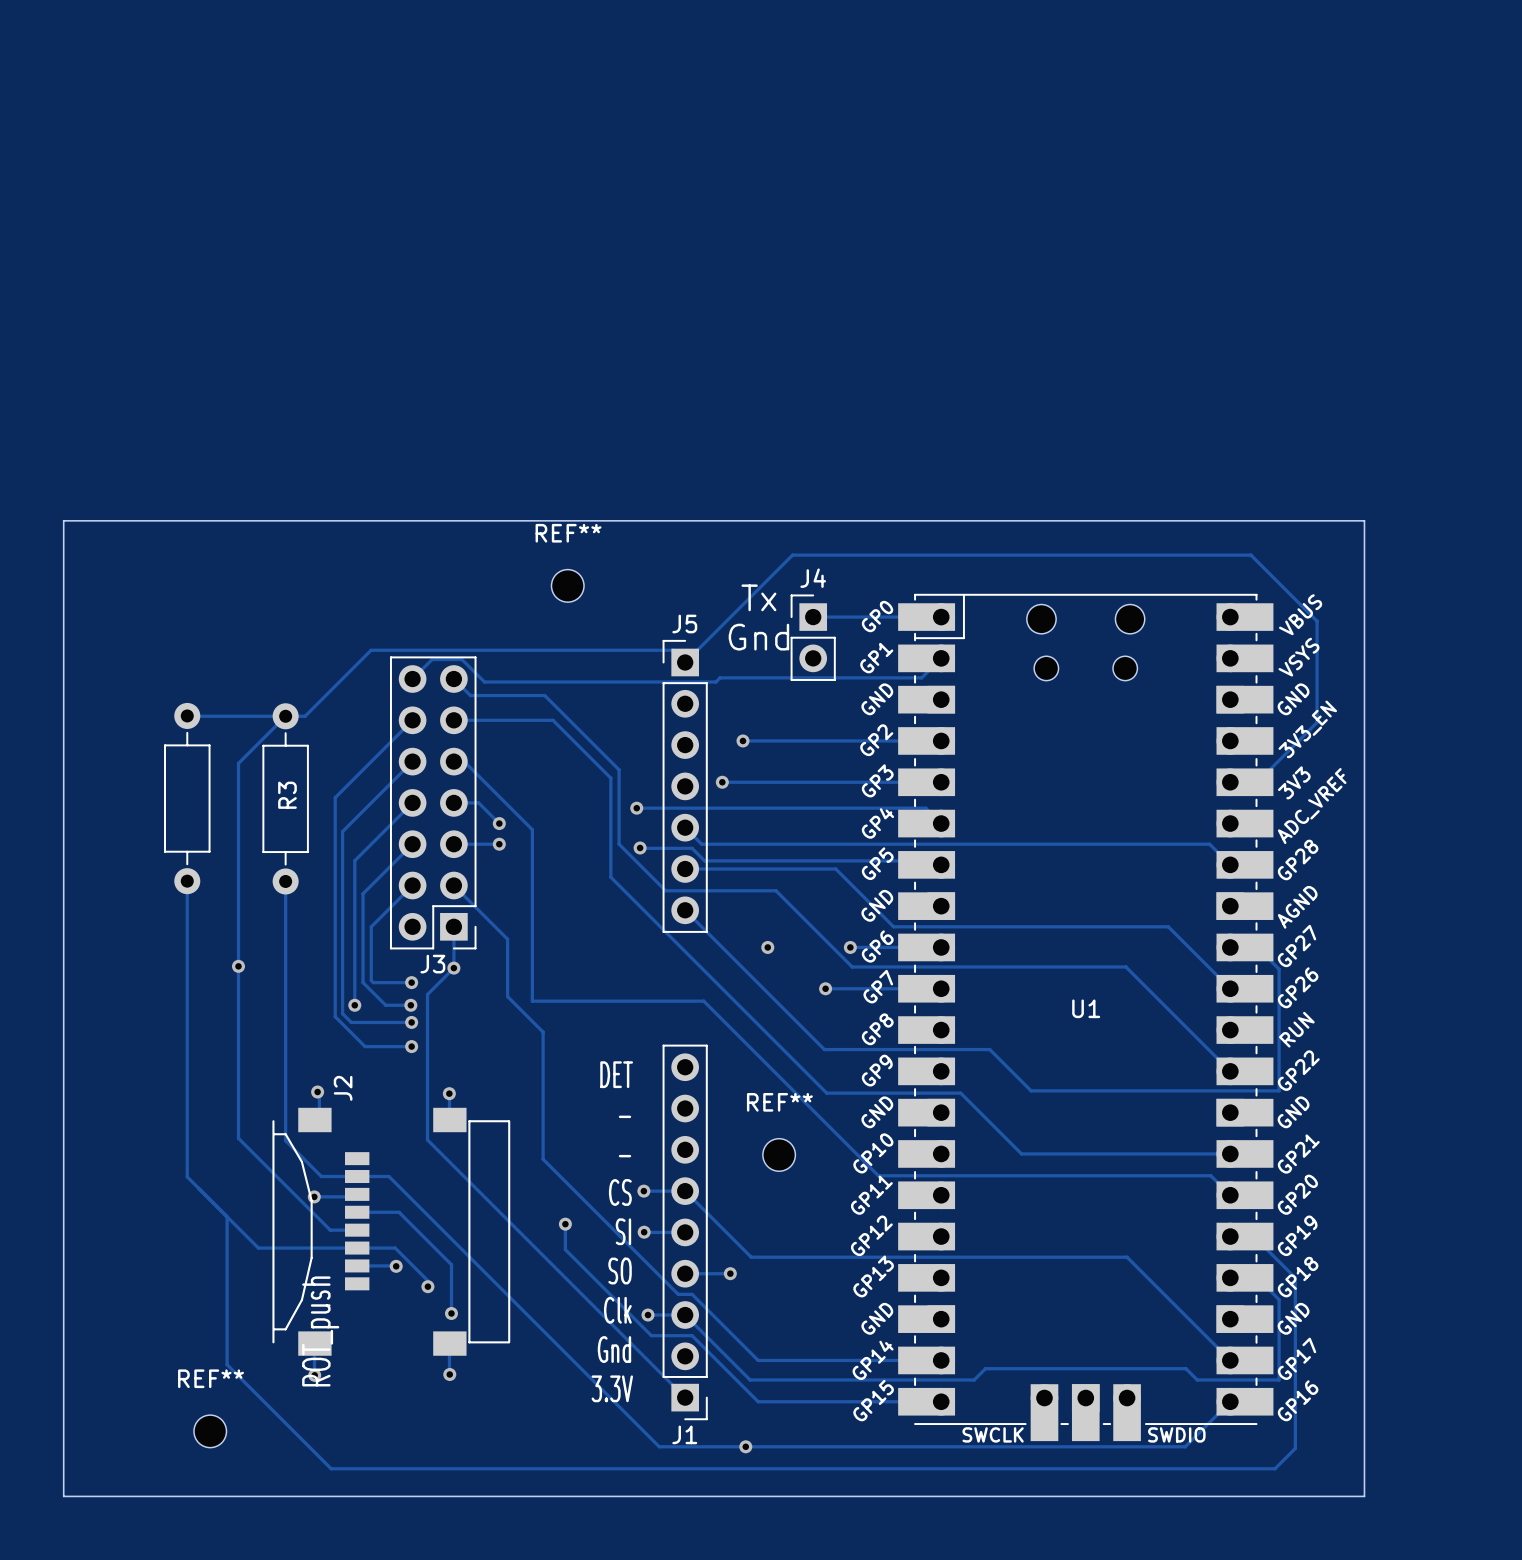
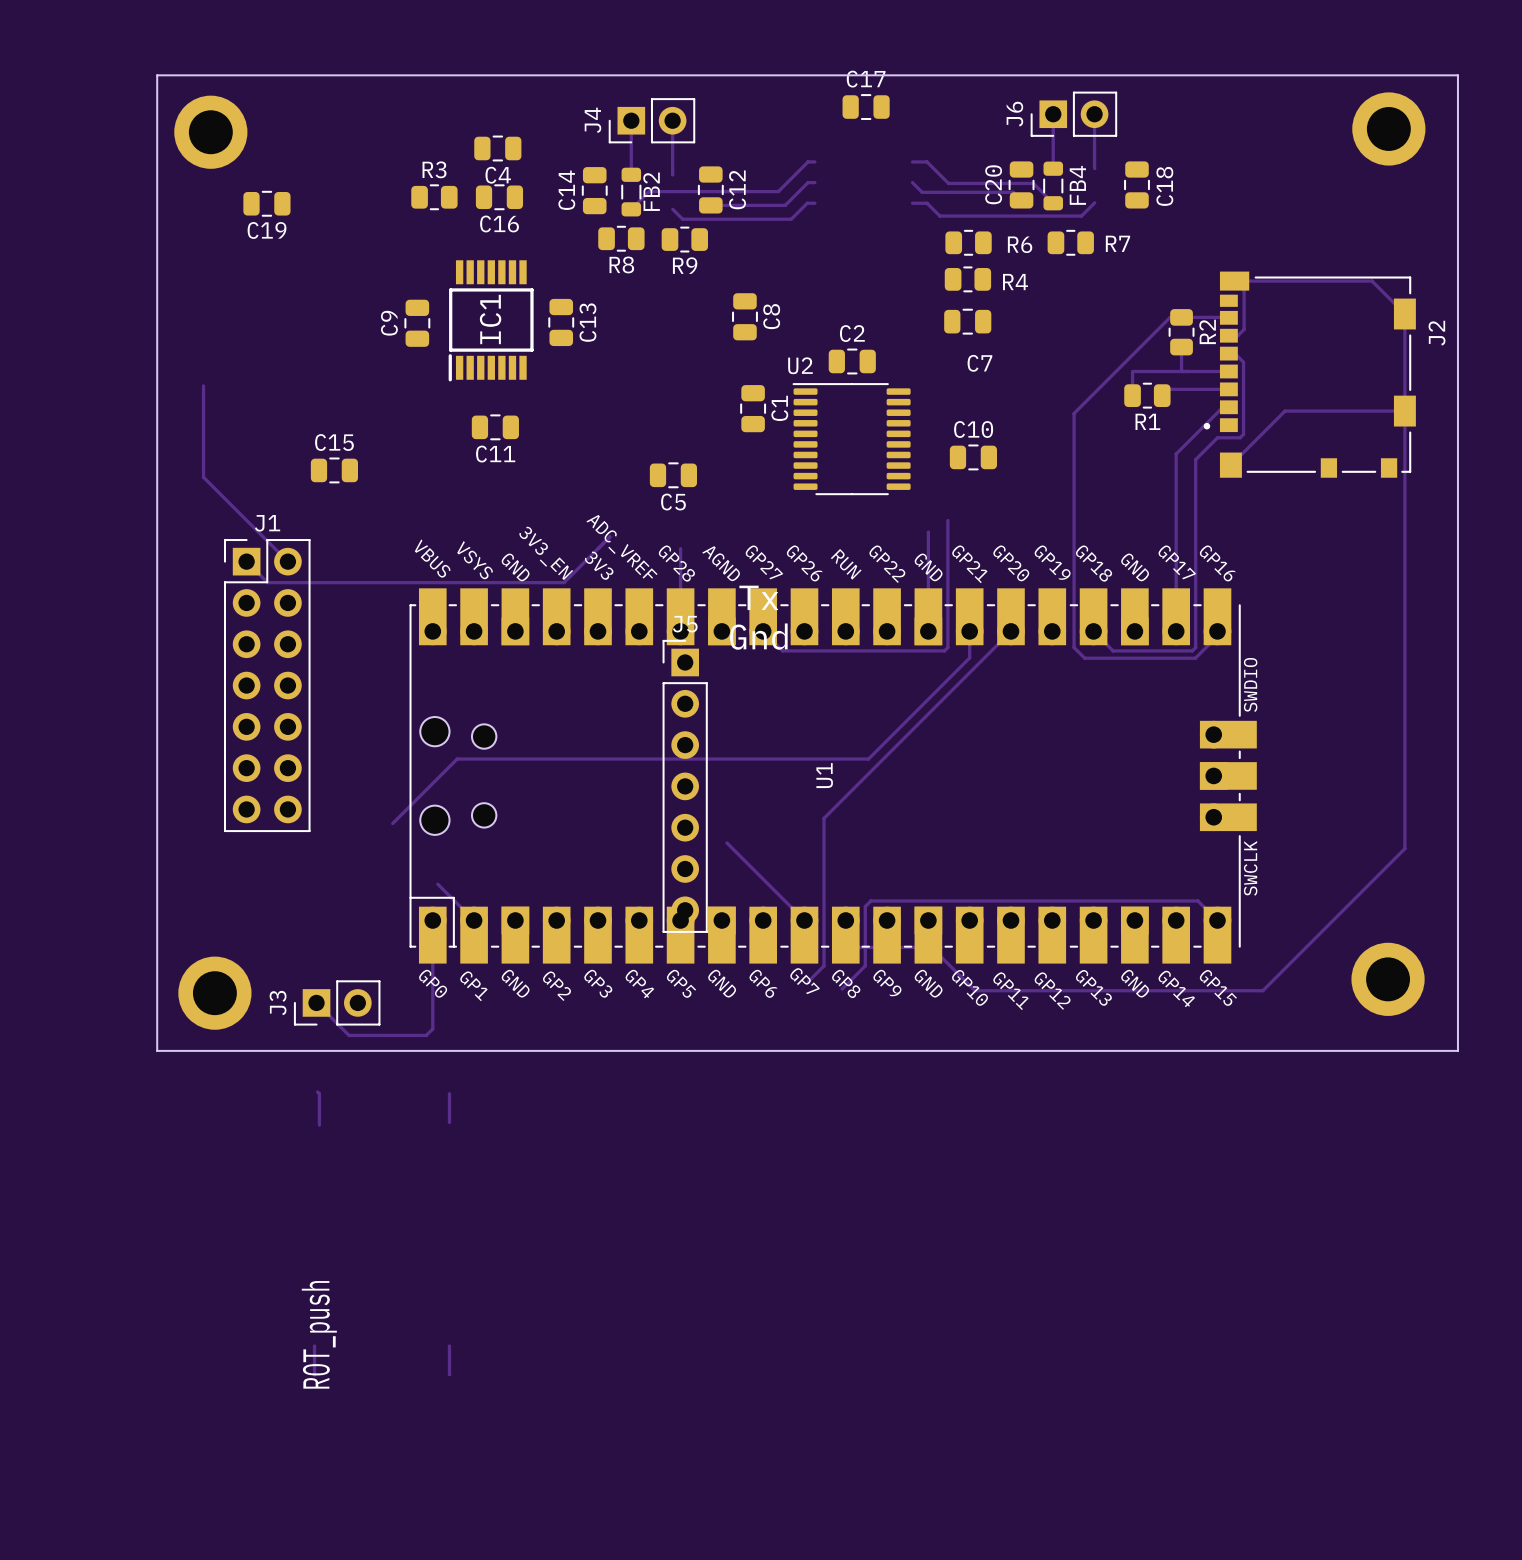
board edge: none -> (157, 75) (1457, 75) (1457, 1050) (157, 1050) (157, 75)
C17: none -> (866, 107)
track: none -> (1053, 114) (1053, 168)
J6: none -> (1073, 114)
track: none -> (1094, 114) (1094, 168)
track: none -> (631, 120) (631, 174)
track: none -> (672, 120) (672, 174)
part: none -> (1388, 128)
part: none -> (210, 132)
C4: none -> (497, 148)
track: none -> (814, 161) (808, 161) (778, 191) (649, 191) (631, 209)
track: none -> (912, 161) (927, 161) (948, 183) (1033, 183) (1053, 203)
track: none -> (814, 182) (808, 182) (785, 205) (710, 205)
track: none -> (912, 182) (922, 192) (1013, 192) (1021, 200)
C20: none -> (1021, 184)
C18: none -> (1137, 184)
FB4: none -> (1053, 185)
C12: none -> (710, 189)
C14: none -> (594, 190)
FB2: none -> (631, 192)
C16: none -> (499, 197)
track: none -> (1094, 202) (1081, 216) (939, 216) (927, 203) (912, 203)
C19: none -> (266, 203)
track: none -> (814, 203) (807, 203) (791, 219) (682, 219) (672, 209)
R8: none -> (621, 238)
R9: none -> (684, 239)
R6: none -> (968, 242)
R7: none -> (1070, 242)
R4: none -> (967, 279)
C8: none -> (744, 316)
track: none -> (1228, 317) (1170, 317) (1074, 413) (1074, 647) (1084, 658) (1195, 658) (1217, 636) (1217, 631)
IC1: none -> (491, 320)
C7: none -> (967, 321)
C13: none -> (561, 322)
C9: none -> (417, 323)
R2: none -> (1181, 332)
track: none -> (1228, 335) (1237, 335) (1244, 329) (1244, 290) (1234, 281) (1371, 281) (1404, 314) (1404, 848) (1262, 990) (974, 990) (928, 944) (928, 920)
track: none -> (1181, 347) (1181, 371)
track: none -> (1228, 353) (1234, 353) (1243, 362) (1243, 434) (1240, 437) (1217, 437) (1195, 459) (1195, 647) (1192, 650) (1113, 650) (1093, 631)
C2: none -> (852, 361)
track: none -> (1228, 371) (1133, 371) (1132, 395)
track: none -> (203, 385) (203, 477) (287, 561)
track: none -> (1228, 389) (1168, 389) (1162, 395)
R1: none -> (1147, 395)
track: none -> (1228, 407) (1222, 407) (1176, 453) (1176, 631)
C1: none -> (753, 408)
track: none -> (1404, 411) (1285, 411) (1230, 465)
C11: none -> (495, 427)
U2: none -> (851, 439)
C10: none -> (973, 457)
C15: none -> (334, 470)
C5: none -> (673, 475)
board edge: (63, 520) (1364, 520) (1364, 1496) (63, 1496) (63, 520) -> none
track: none -> (947, 520) (947, 647) (944, 650) (782, 650) (763, 631)
track: none -> (928, 532) (928, 631)
track: none -> (609, 536) (564, 582) (267, 582) (246, 561)
track: none -> (680, 548) (680, 631)
REF**: (567, 585) -> none
track: (813, 617) (941, 617) -> none
track: none -> (969, 631) (969, 657) (868, 759) (457, 759) (392, 823)
track: none -> (1010, 631) (824, 818) (824, 965) (808, 981)
J4 rotation: 0° (813, 637) -> 90° counterclockwise (651, 120)
J4 position: (813, 637) -> (651, 120)
J3 footprint: [390, 656, 477, 950] -> [293, 980, 381, 1026]
track: (941, 658) (921, 677) (720, 677) (715, 682) (484, 682) (461, 659) (432, 659) (412, 679) -> none
track: (453, 679) (470, 695) (544, 695) (619, 769) (619, 844) (665, 890) (776, 890) (852, 966) (1125, 966) (1230, 1071) -> none
R3 footprint: [262, 703, 309, 895] -> [411, 184, 458, 211]
track: (187, 715) (305, 716) (371, 650) (672, 650) (685, 662) (792, 555) (1250, 555) (1317, 621) (1317, 722) (1257, 782) (1230, 782) -> none
track: (285, 716) (238, 763) (238, 1138) (330, 1230) (357, 1230) -> none
track: (412, 720) (335, 797) (335, 1016) (365, 1046) (411, 1046) -> none
track: (453, 720) (553, 720) (610, 778) (610, 877) (826, 1093) (960, 1093) (1021, 1153) (1230, 1153) -> none
track: (742, 740) (941, 740) -> none
via: (742, 740) -> none
track: (412, 761) (342, 831) (342, 1013) (351, 1022) (411, 1022) -> none
track: (453, 761) (464, 761) (532, 829) (532, 1001) (703, 1001) (878, 1175) (1210, 1175) (1230, 1195) -> none
track: (722, 782) (941, 782) -> none
via: (722, 782) -> none
part: (187, 798) -> none
track: (412, 802) (354, 860) (354, 1005) -> none
track: (453, 802) (478, 802) (499, 823) -> none
track: (635, 807) (925, 808) (941, 823) -> none
via: (636, 808) -> none
via: (499, 823) -> none
track: (685, 827) (701, 844) (1209, 844) (1230, 864) -> none
track: none -> (726, 842) (804, 920)
track: (412, 844) (363, 893) (363, 982) (385, 1005) (410, 1005) -> none
track: (453, 844) (499, 844) -> none
via: (499, 844) -> none
track: (640, 847) (692, 848) (704, 860) (937, 860) (941, 864) -> none
via: (640, 847) -> none
track: (685, 868) (835, 868) (893, 926) (1168, 926) (1230, 988) -> none
track: (187, 881) (187, 1176) (258, 1248) (395, 1248) (427, 1280) (427, 1286) -> none
track: (285, 881) (285, 1140) (321, 1176) (388, 1176) (659, 1446) (1185, 1446) (1230, 1401) -> none
track: none -> (437, 884) (474, 920)
track: (412, 885) (371, 926) (371, 980) (373, 982) (411, 982) -> none
track: (453, 885) (507, 939) (507, 996) (543, 1032) (543, 1159) (678, 1294) (692, 1294) (758, 1360) (941, 1360) -> none
track: (685, 910) (824, 1049) (989, 1049) (1031, 1090) (1279, 1090) (1279, 969) (1257, 947) (1230, 947) -> none
track: none -> (432, 920) (432, 1028) (426, 1035) (349, 1035) (316, 1002)
track: none -> (1217, 920) (1197, 900) (870, 900) (865, 906) (865, 965) (842, 989)
track: (453, 926) (453, 968) (427, 994) (427, 1139) (685, 1397) -> none
via: (767, 947) -> none
via: (850, 947) -> none
J3 name position: J3 (432, 964) -> J3 (278, 1003)
via: (238, 966) -> none
via: (453, 968) -> none
part: none -> (1388, 979)
via: (411, 982) -> none
track: (825, 988) (941, 988) -> none
via: (825, 988) -> none
part: none -> (214, 993)
via: (354, 1005) -> none
via: (410, 1005) -> none
U1 rotation: 0° (1085, 1017) -> 90° counterclockwise (833, 775)
via: (411, 1022) -> none
J1 footprint: [662, 1044, 708, 1421] -> [224, 539, 311, 833]
via: (411, 1046) -> none
text: DET (616, 1074) -> none
J2 name position: J2 (343, 1088) -> J2 (1437, 333)
via: (317, 1092) -> none
via: (449, 1093) -> none
J2 footprint: [272, 1107, 511, 1356] -> [1203, 271, 1416, 478]
text: - (625, 1116) -> none
REF**: (779, 1154) -> none
text: - (625, 1156) -> none
track: (643, 1191) (685, 1191) (751, 1257) (1127, 1257) (1230, 1360) -> none
via: (643, 1191) -> none
text: CS (620, 1192) -> none
track: (314, 1196) (356, 1196) -> none
via: (314, 1196) -> none
track: (357, 1212) (399, 1212) (451, 1264) (451, 1313) -> none
track: (227, 1216) (227, 1364) (331, 1468) (1275, 1468) (1295, 1448) (1295, 1277) (1253, 1236) (1230, 1236) -> none
track: (565, 1224) (565, 1249) (651, 1335) (692, 1335) (758, 1401) (941, 1401) -> none
via: (565, 1224) -> none
text: SI (623, 1231) -> none
track: (644, 1232) (685, 1232) -> none
via: (644, 1232) -> none
track: (357, 1265) (396, 1266) -> none
via: (396, 1266) -> none
text: SO (620, 1271) -> none
track: (685, 1273) (730, 1273) -> none
via: (730, 1273) -> none
track: (1230, 1277) (1257, 1277) (1279, 1299) (1279, 1379) (1197, 1379) (1186, 1368) (985, 1368) (974, 1379) (750, 1379) (685, 1315) (648, 1315) -> none
via: (427, 1286) -> none
text: Clk (617, 1310) -> none
via: (451, 1313) -> none
via: (648, 1315) -> none
text: Gnd (614, 1349) -> none
via: (449, 1374) -> none
via: (314, 1375) -> none
text: 3.3V (612, 1388) -> none
REF**: (210, 1431) -> none
J1 name position: J1 (684, 1434) -> J1 (267, 523)
via: (745, 1446) -> none

